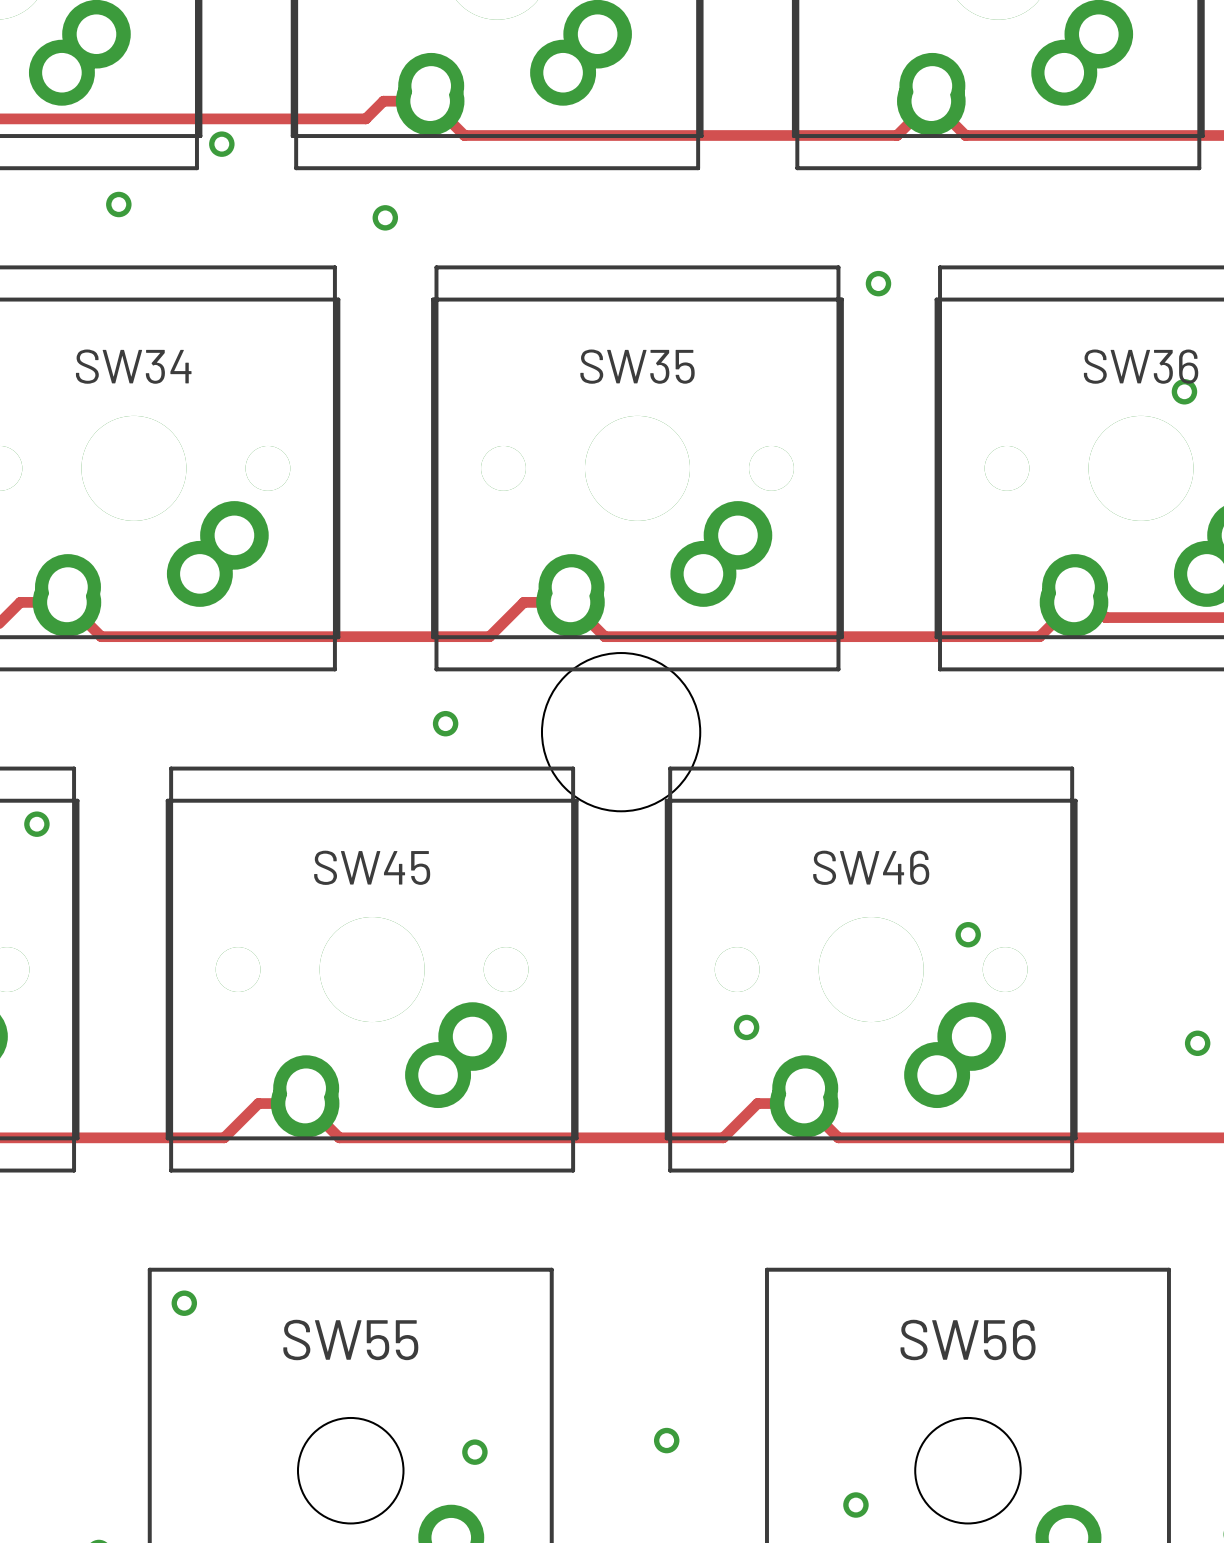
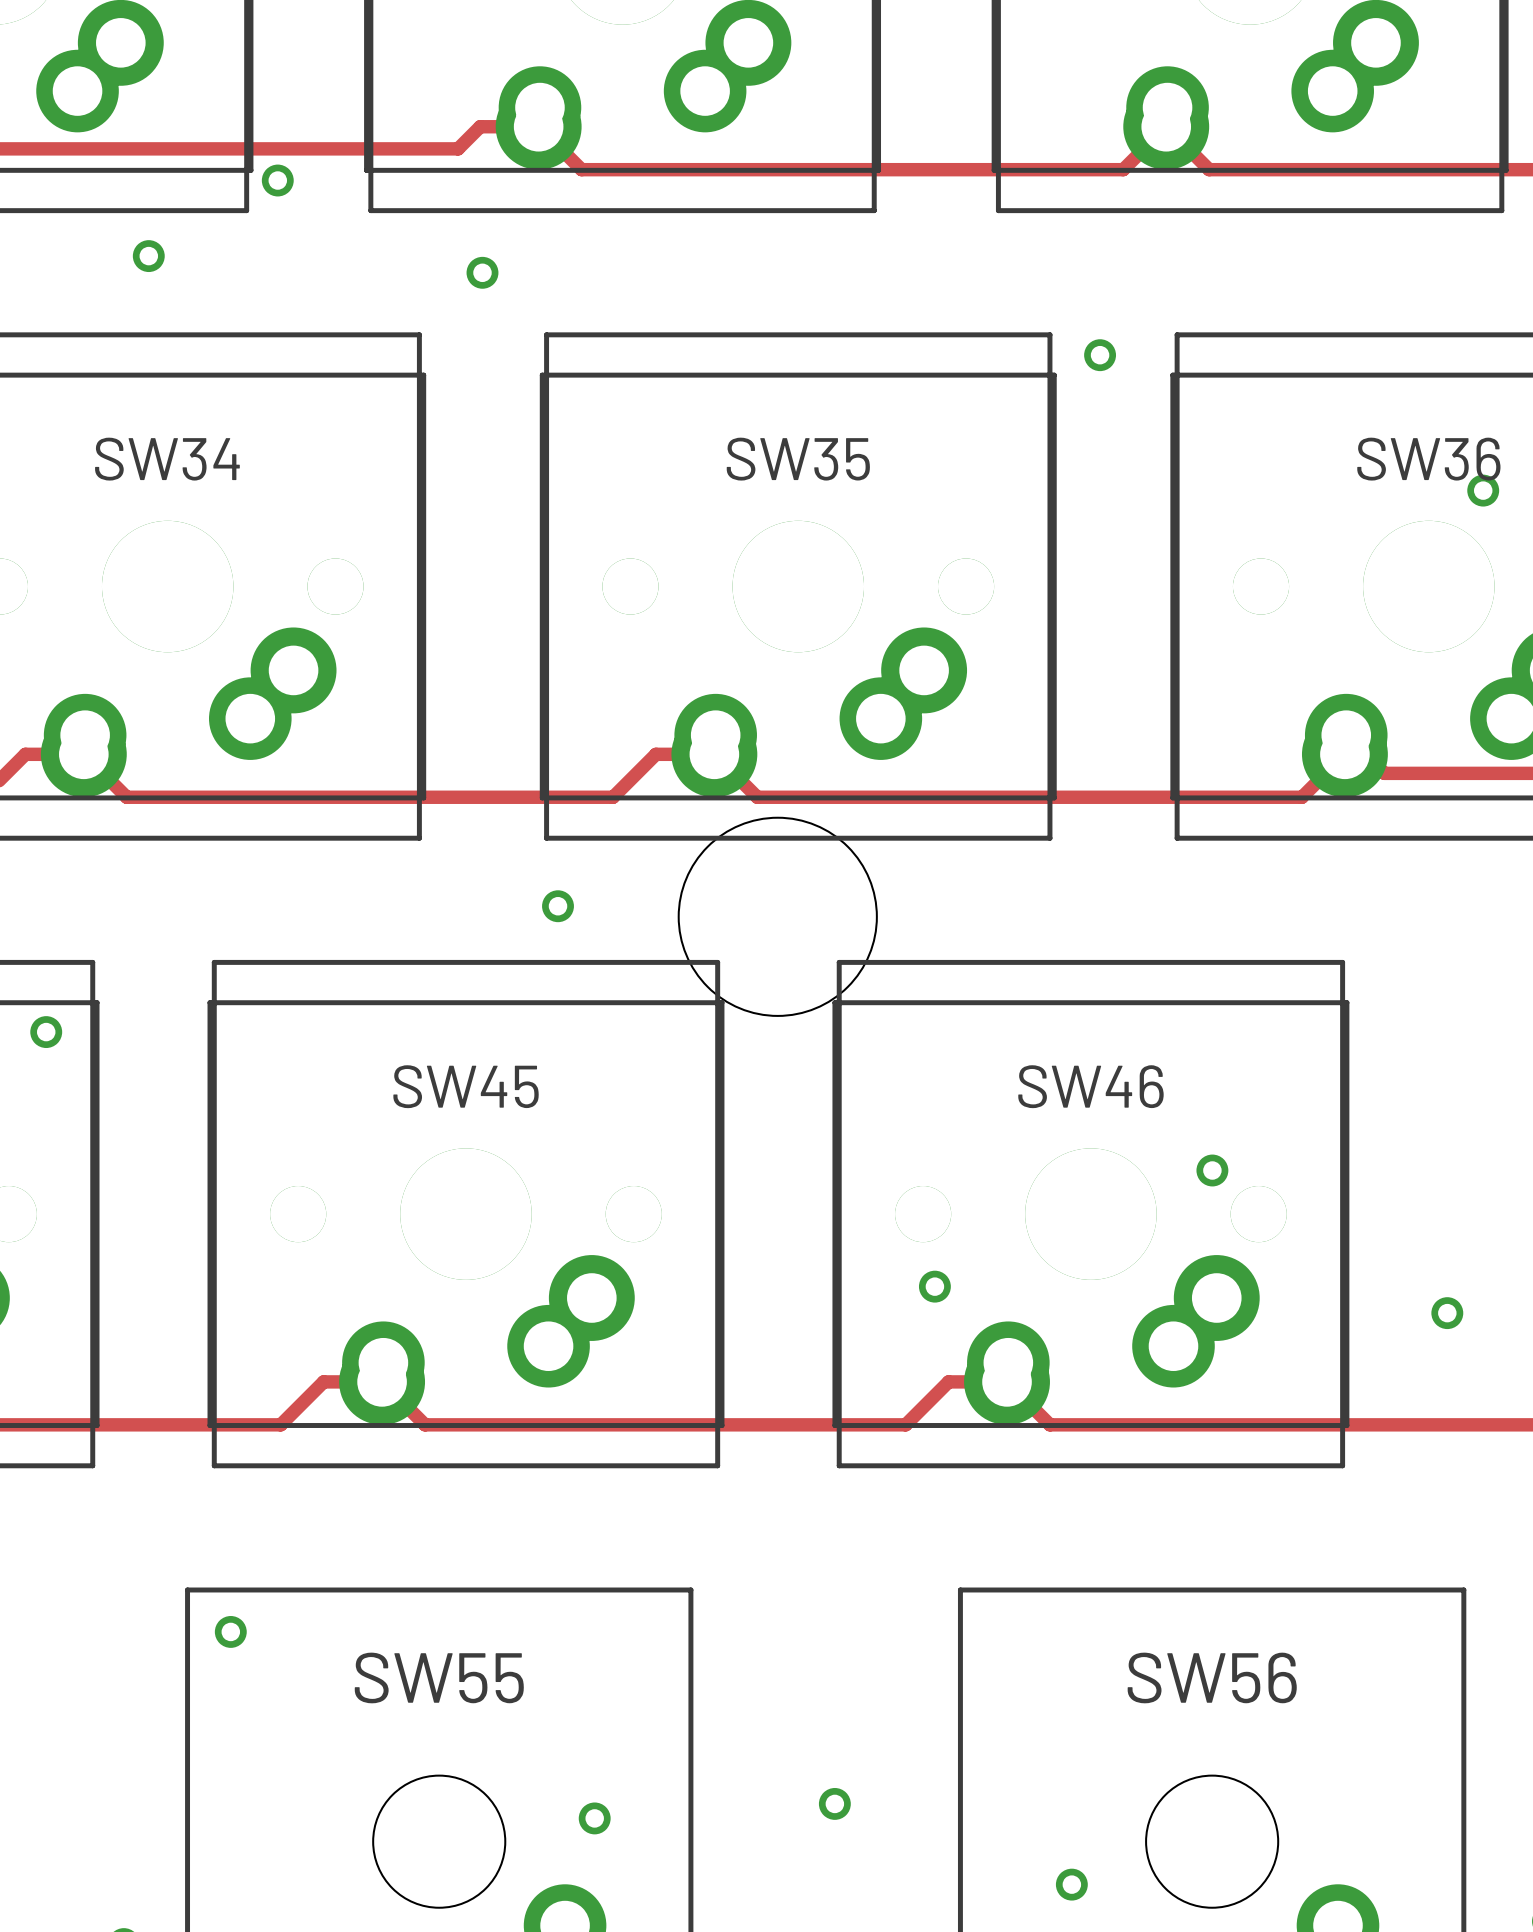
part position: (1197, 1043) -> (1447, 1313)

